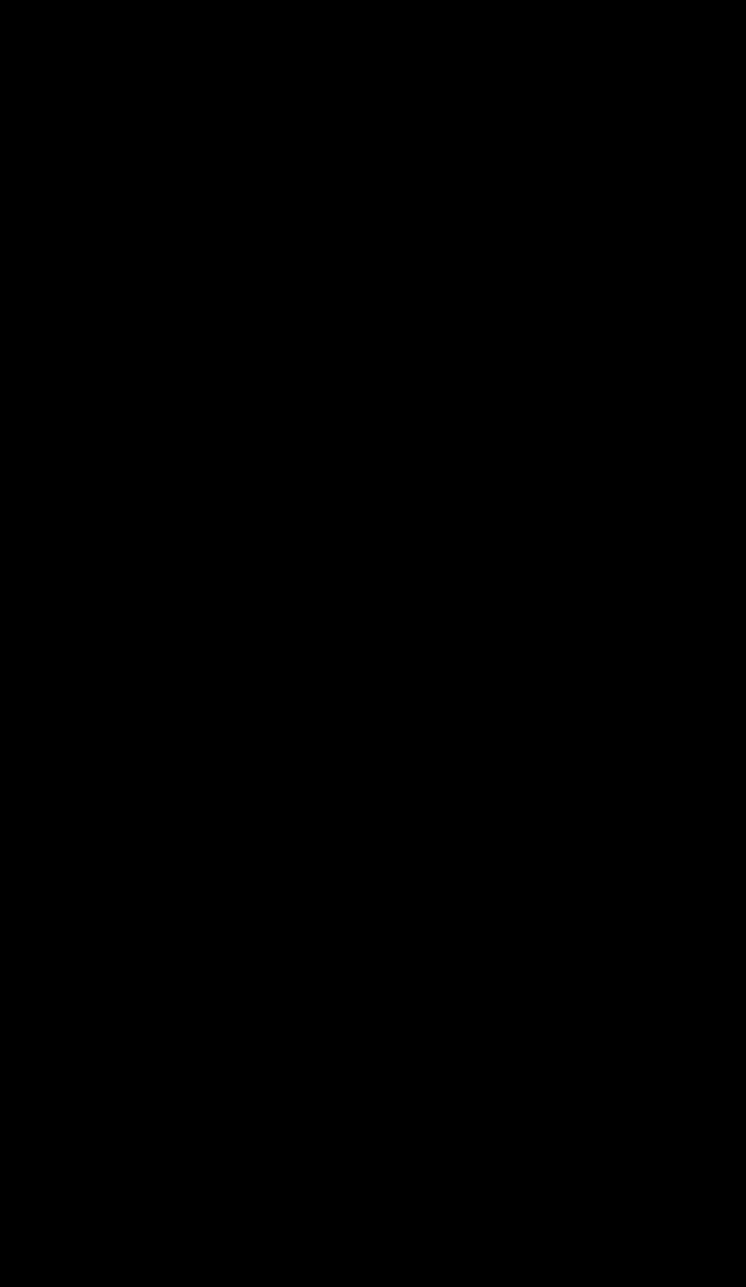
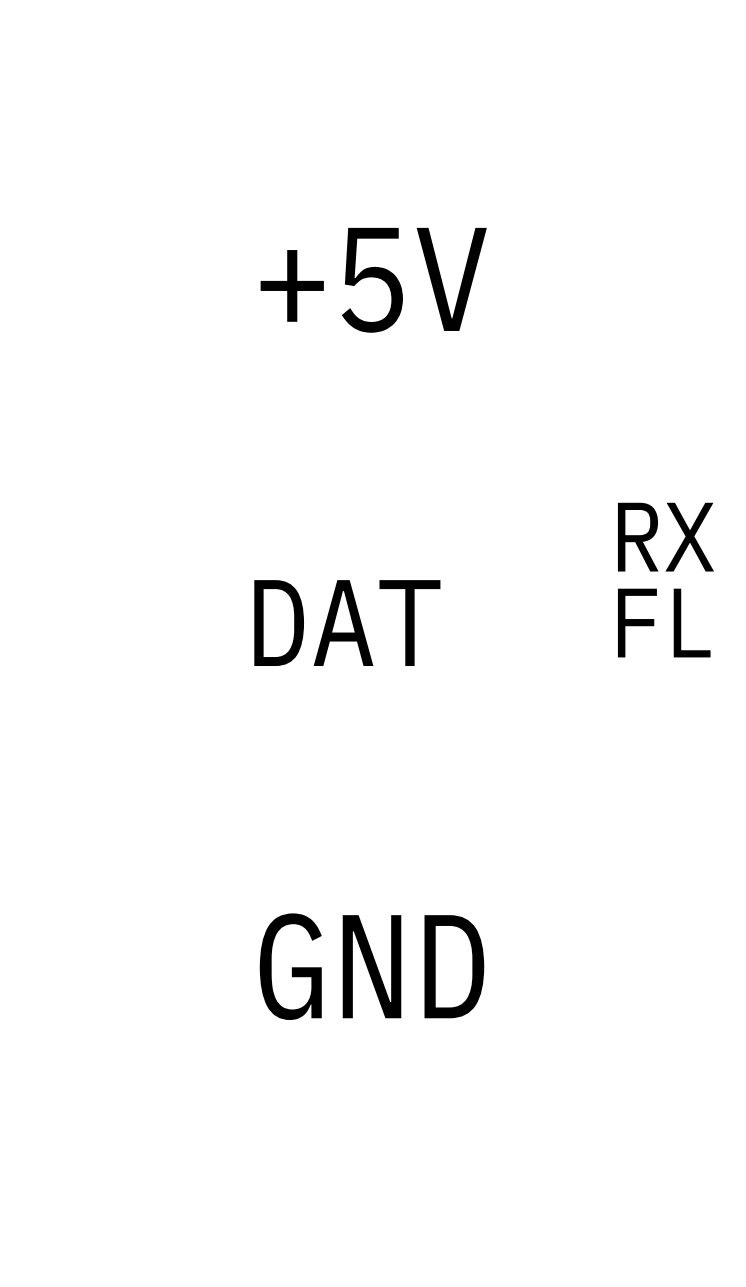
text: none -> +5V (373, 280)
text: none -> RX (666, 537)
text: none -> DAT (347, 623)
text: none -> FL (664, 623)
text: none -> GND (372, 966)

